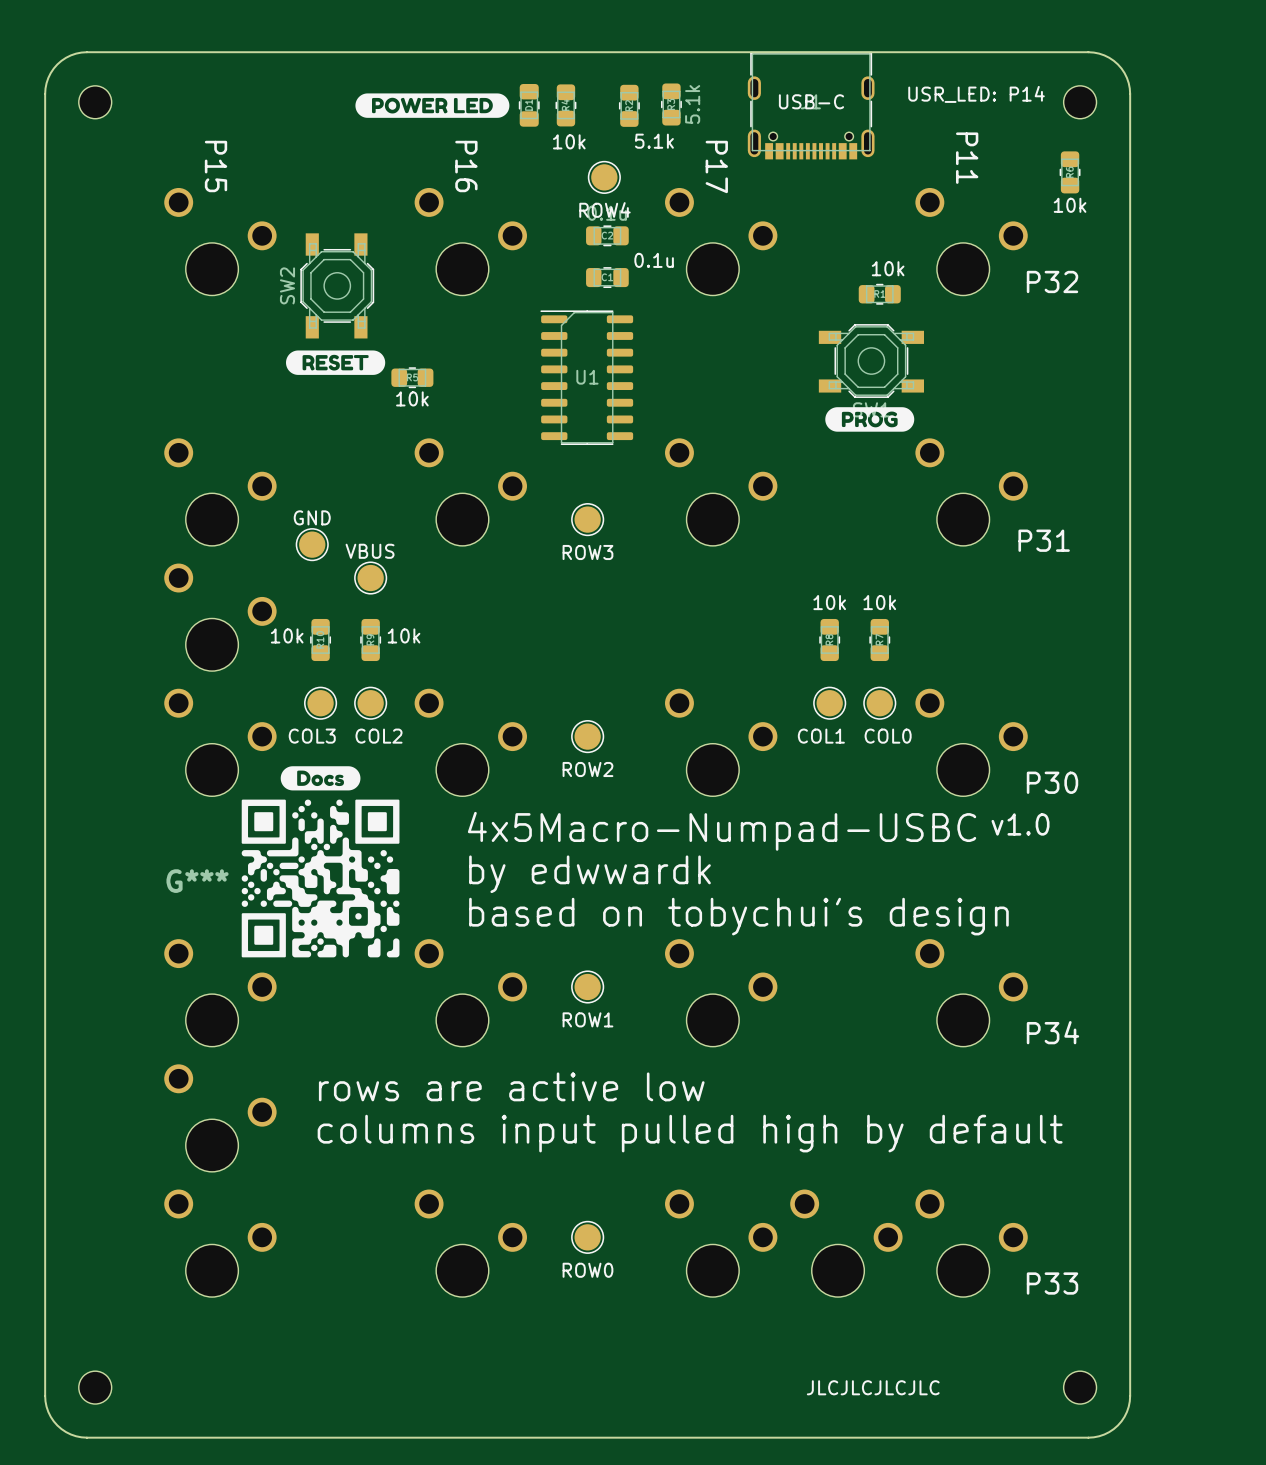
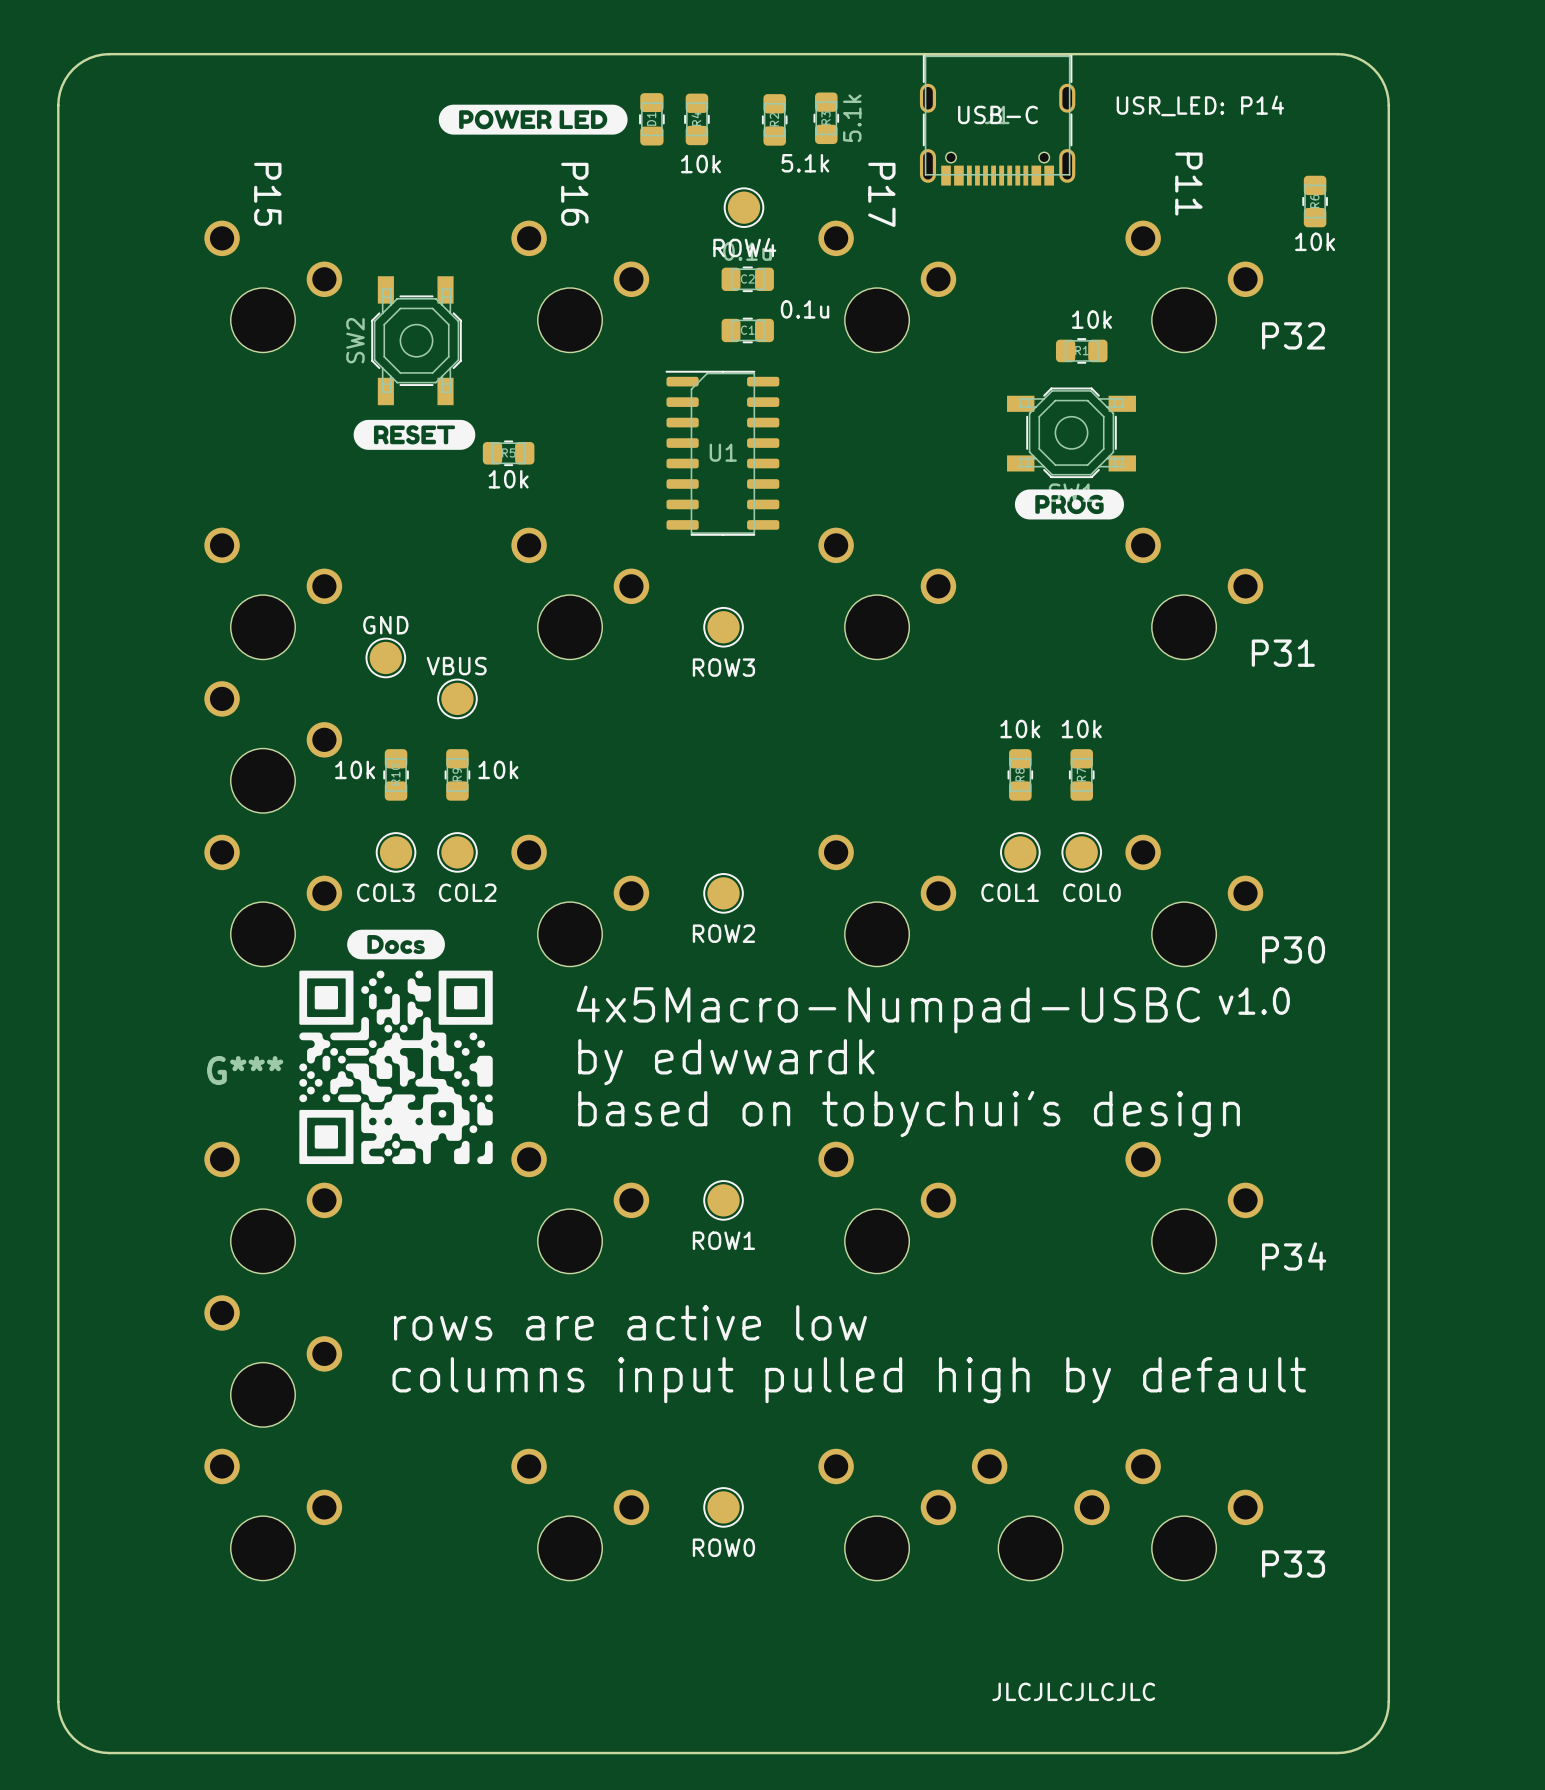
part: (95, 102) -> none
part: (1080, 102) -> none
part: (95, 1387) -> none
part: (1080, 1387) -> none

